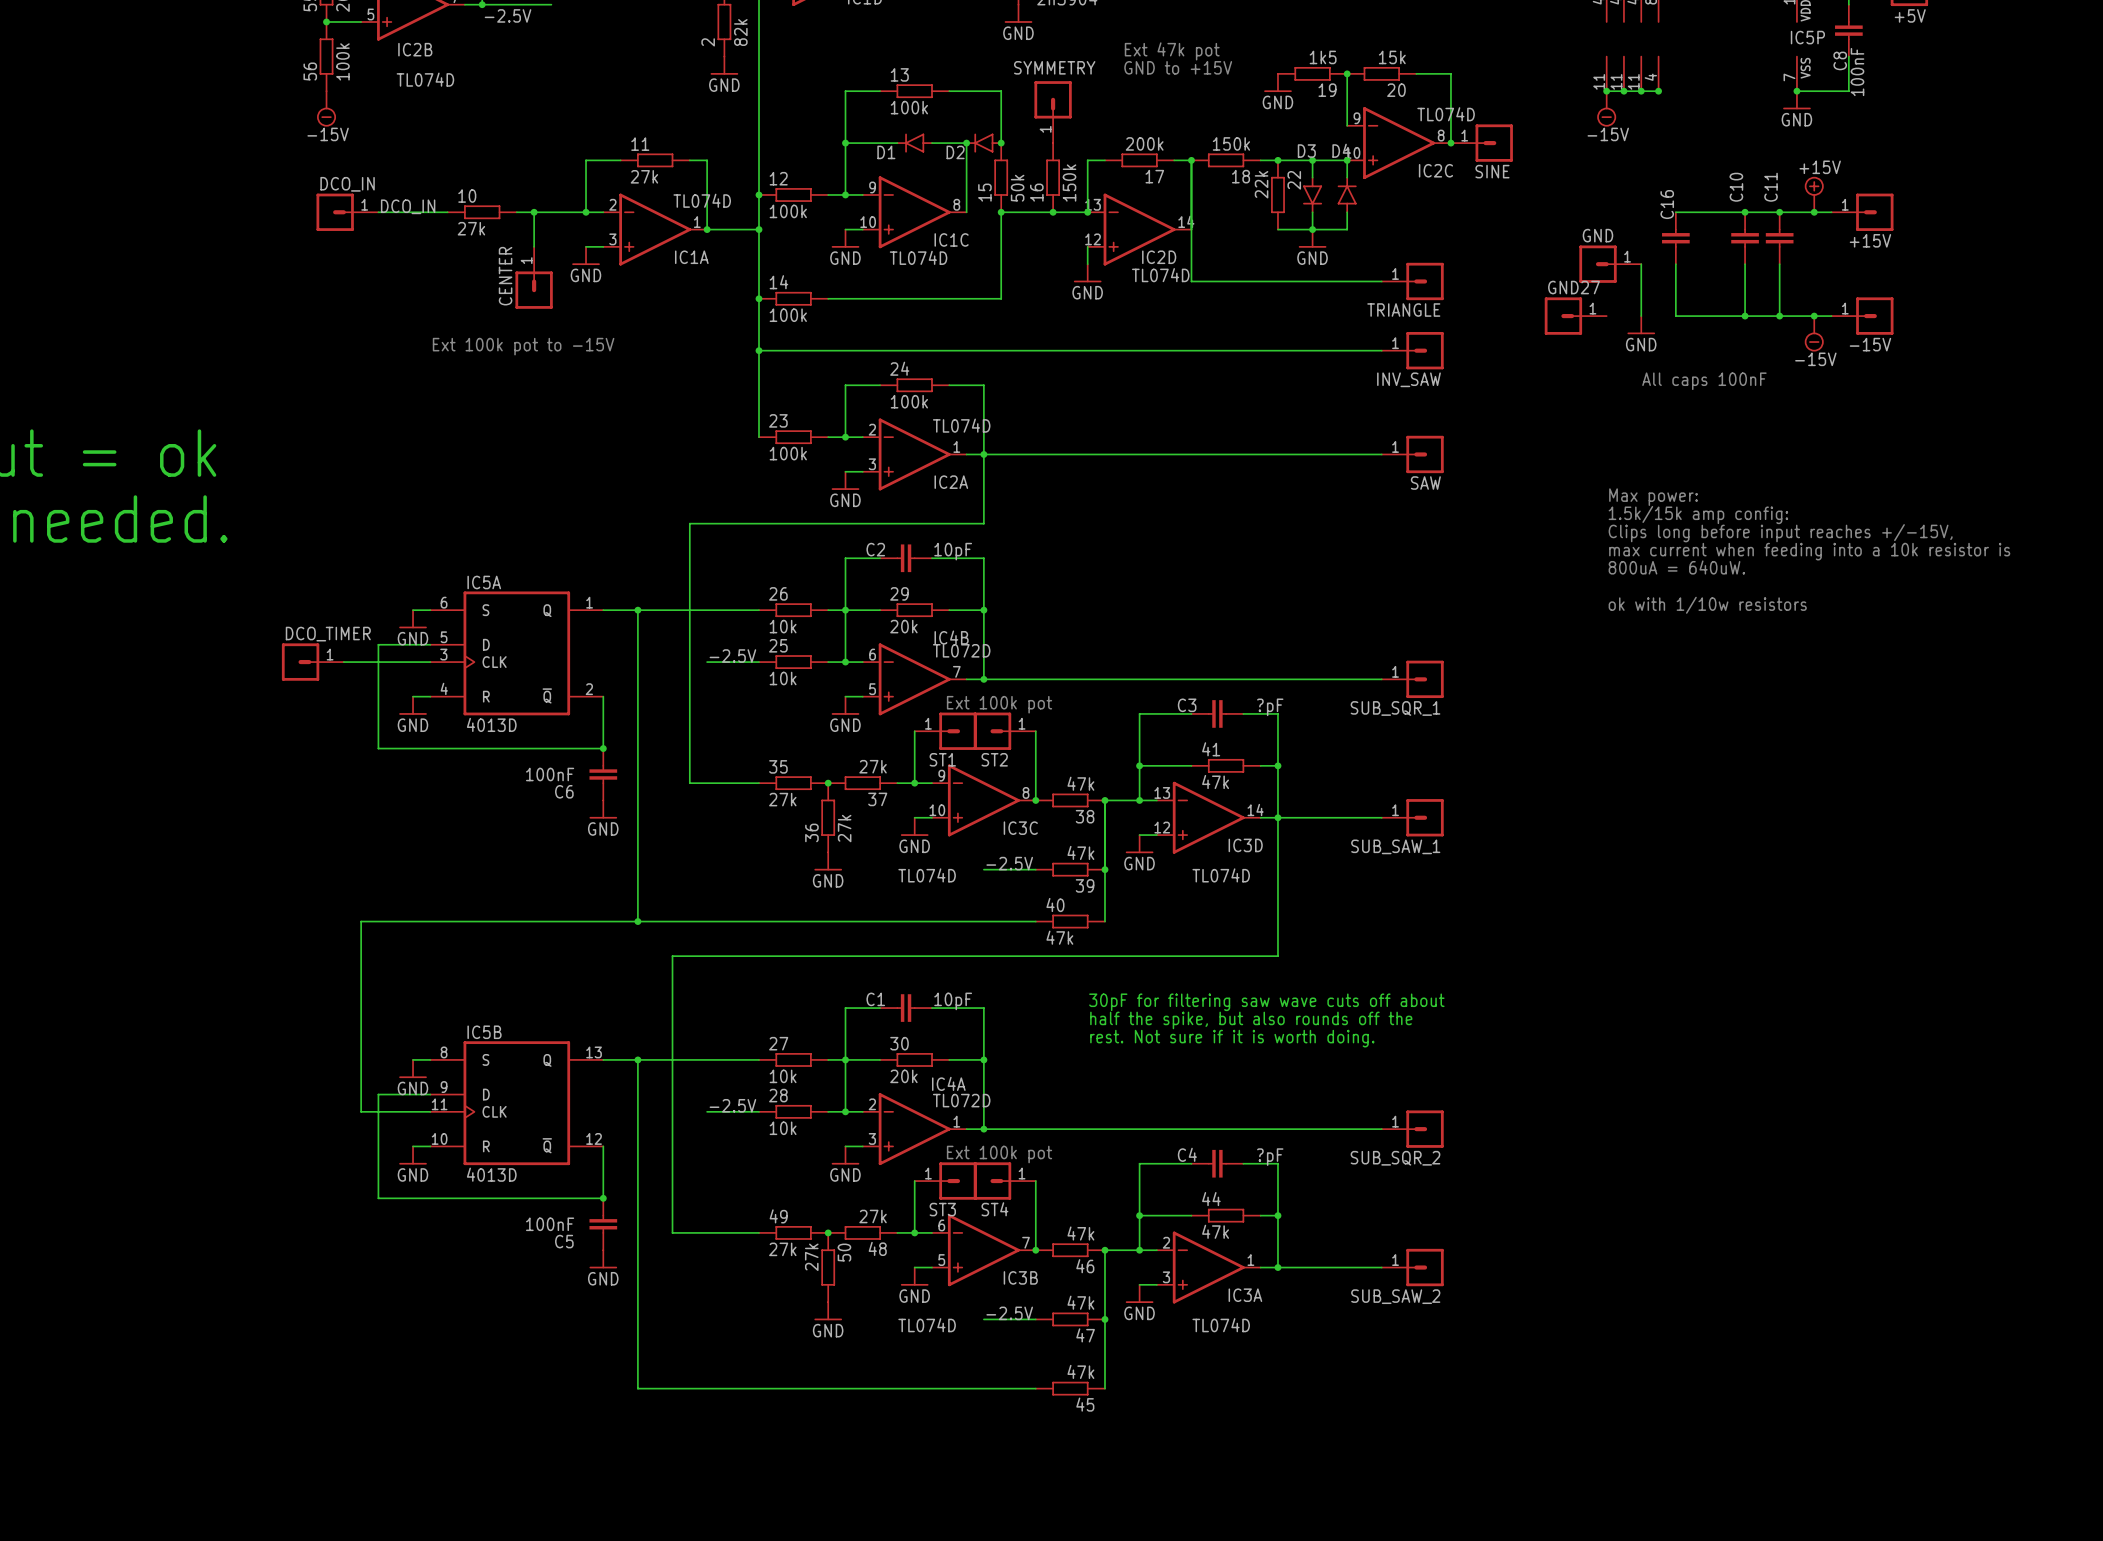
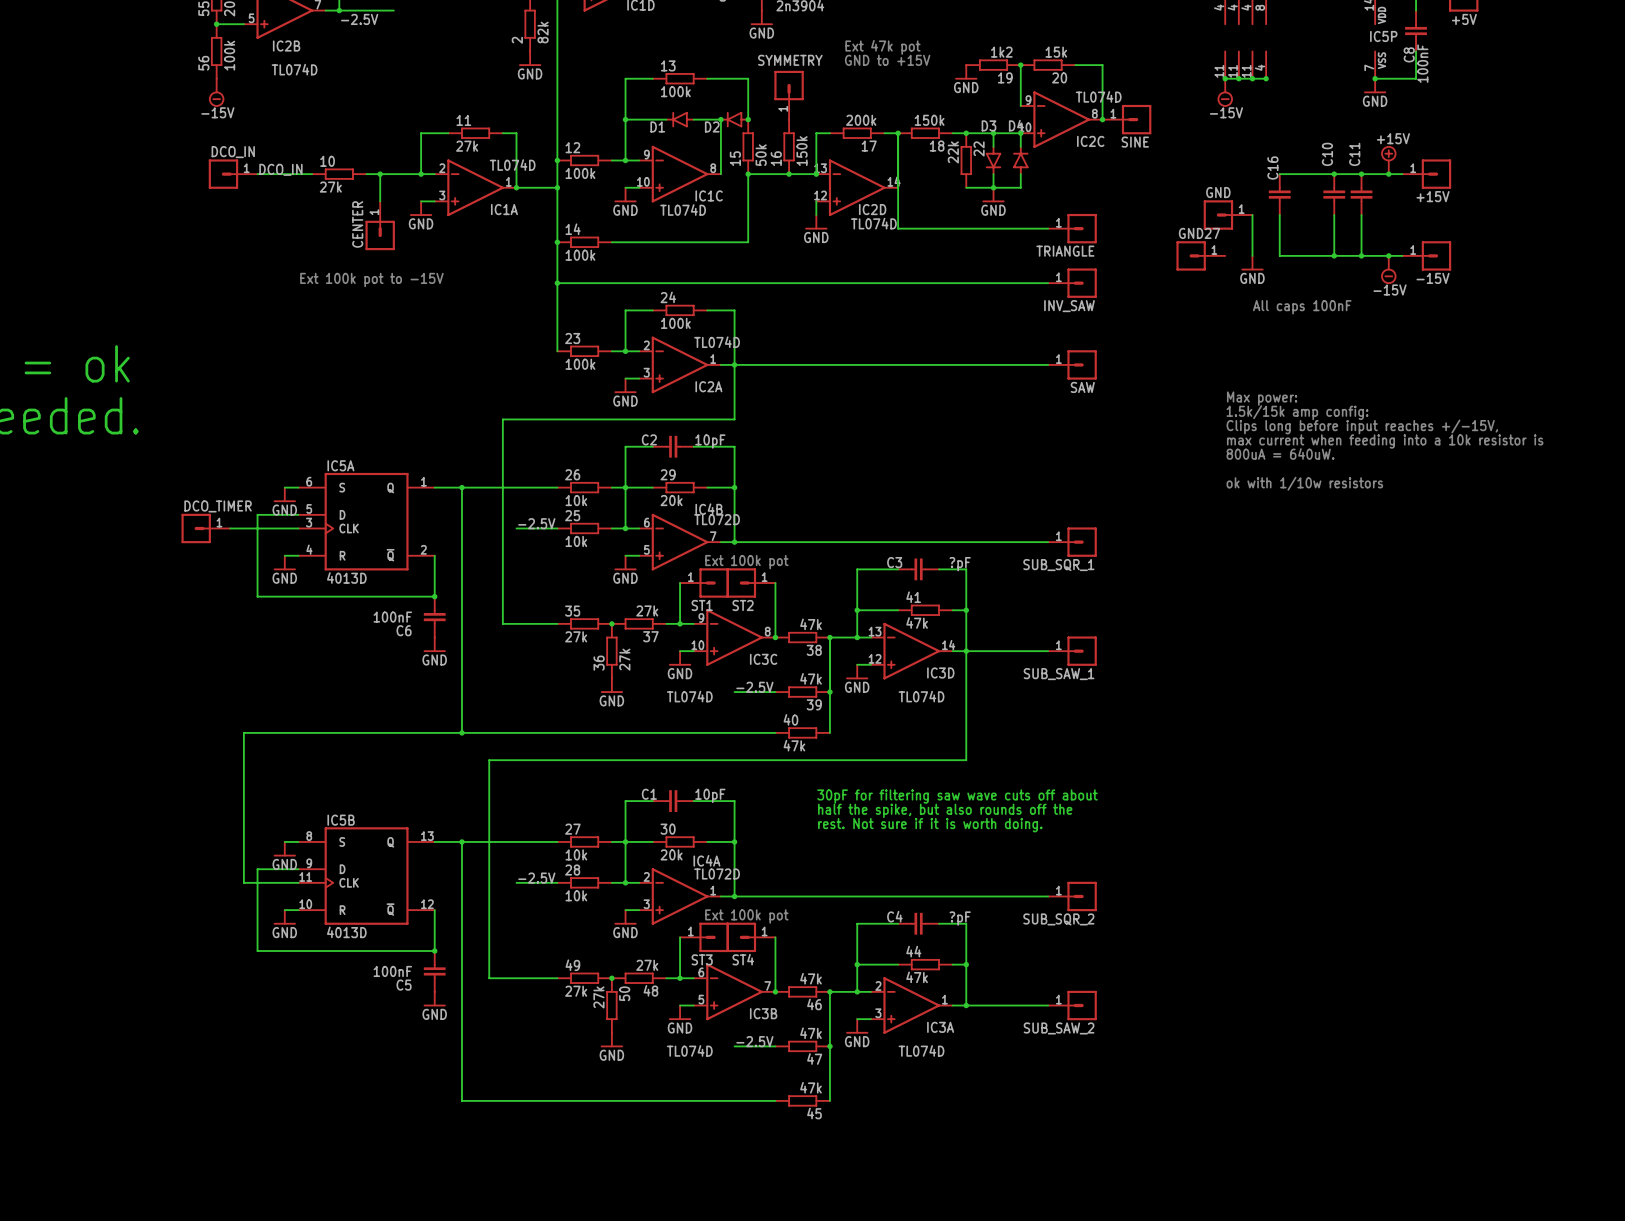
19 value: 1k5 (1323, 57) -> 1k2 (1001, 52)

